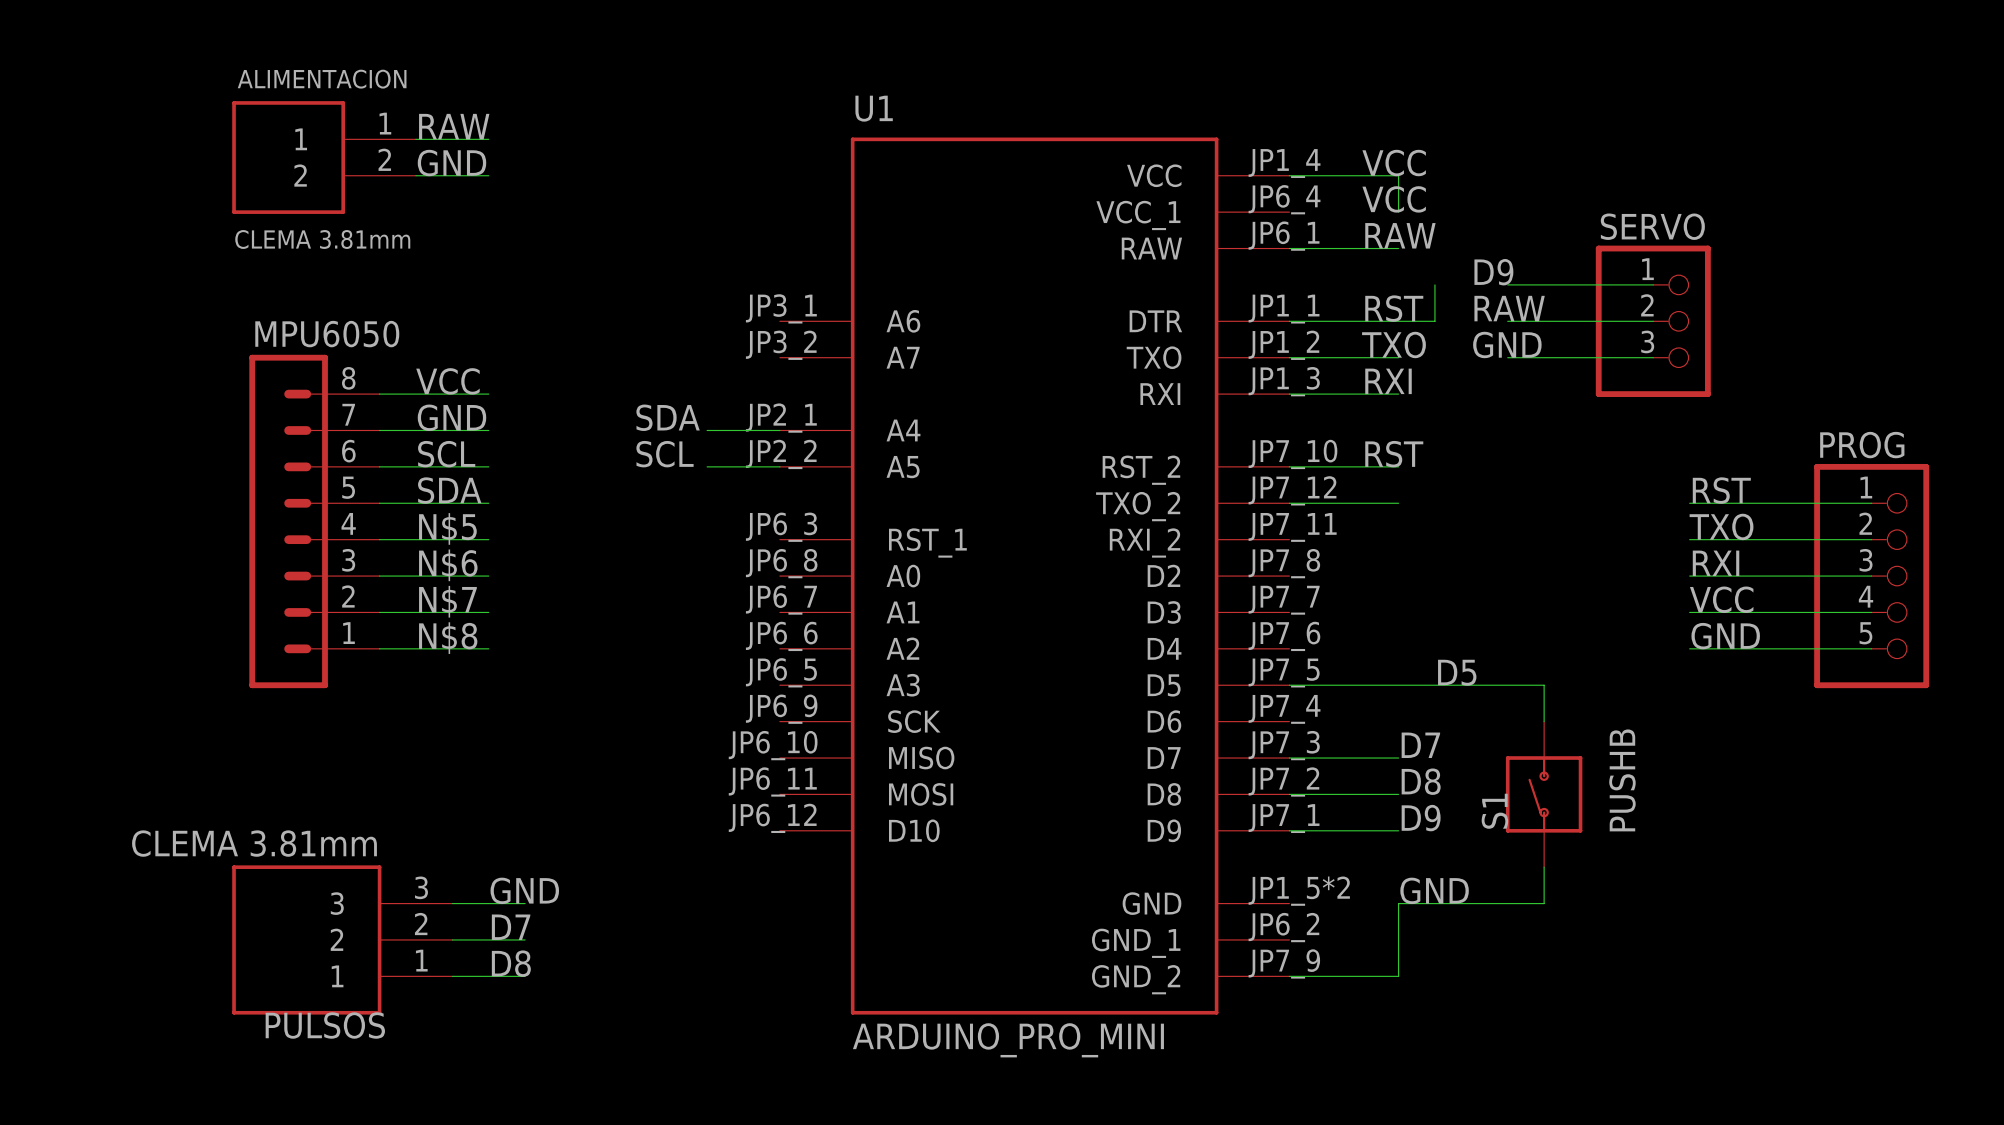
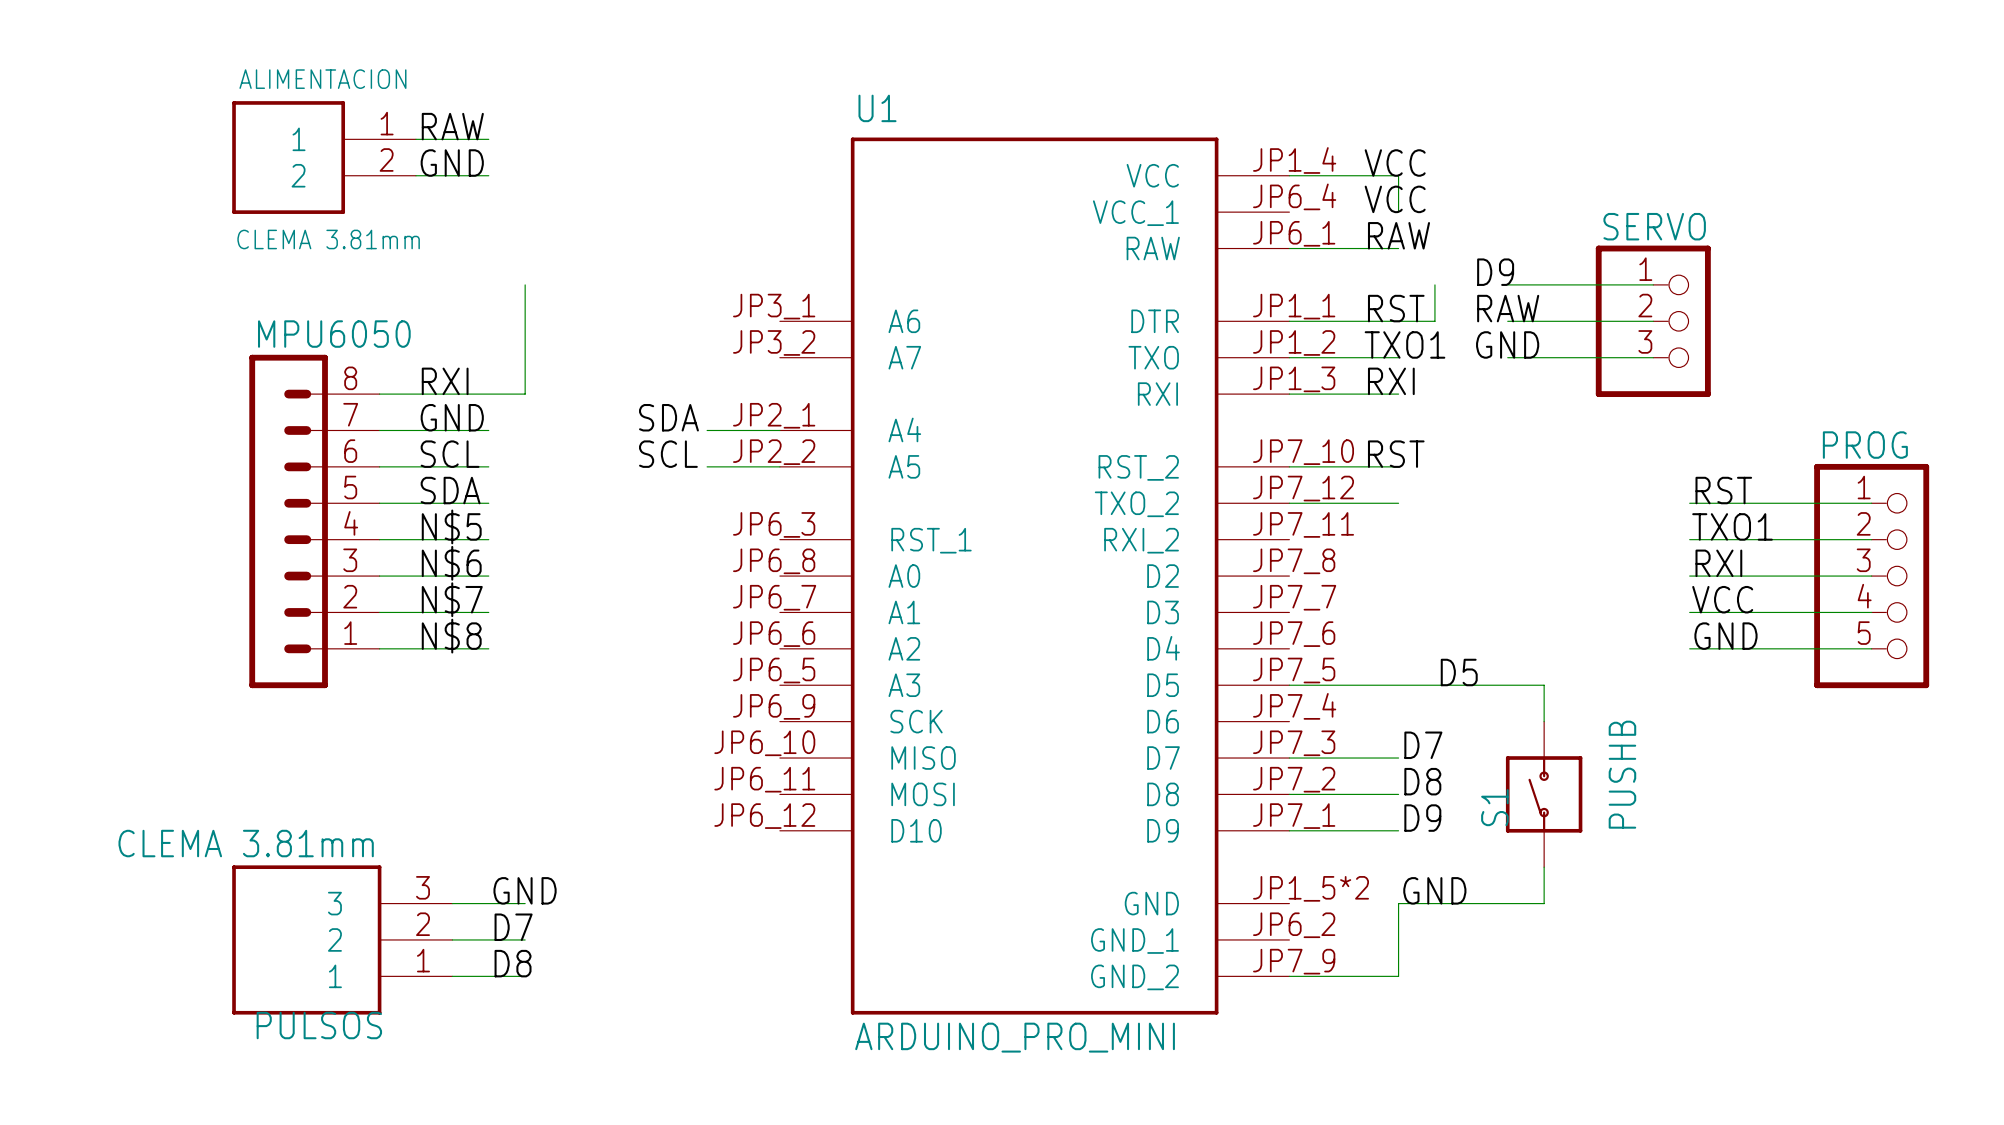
wire: none -> (525, 284) (525, 394) (488, 394)
label: TXO (1393, 344) -> TXO1 (1405, 344)
label: VCC (447, 381) -> RXI (445, 381)
label: TXO (1721, 526) -> TXO1 (1732, 526)

